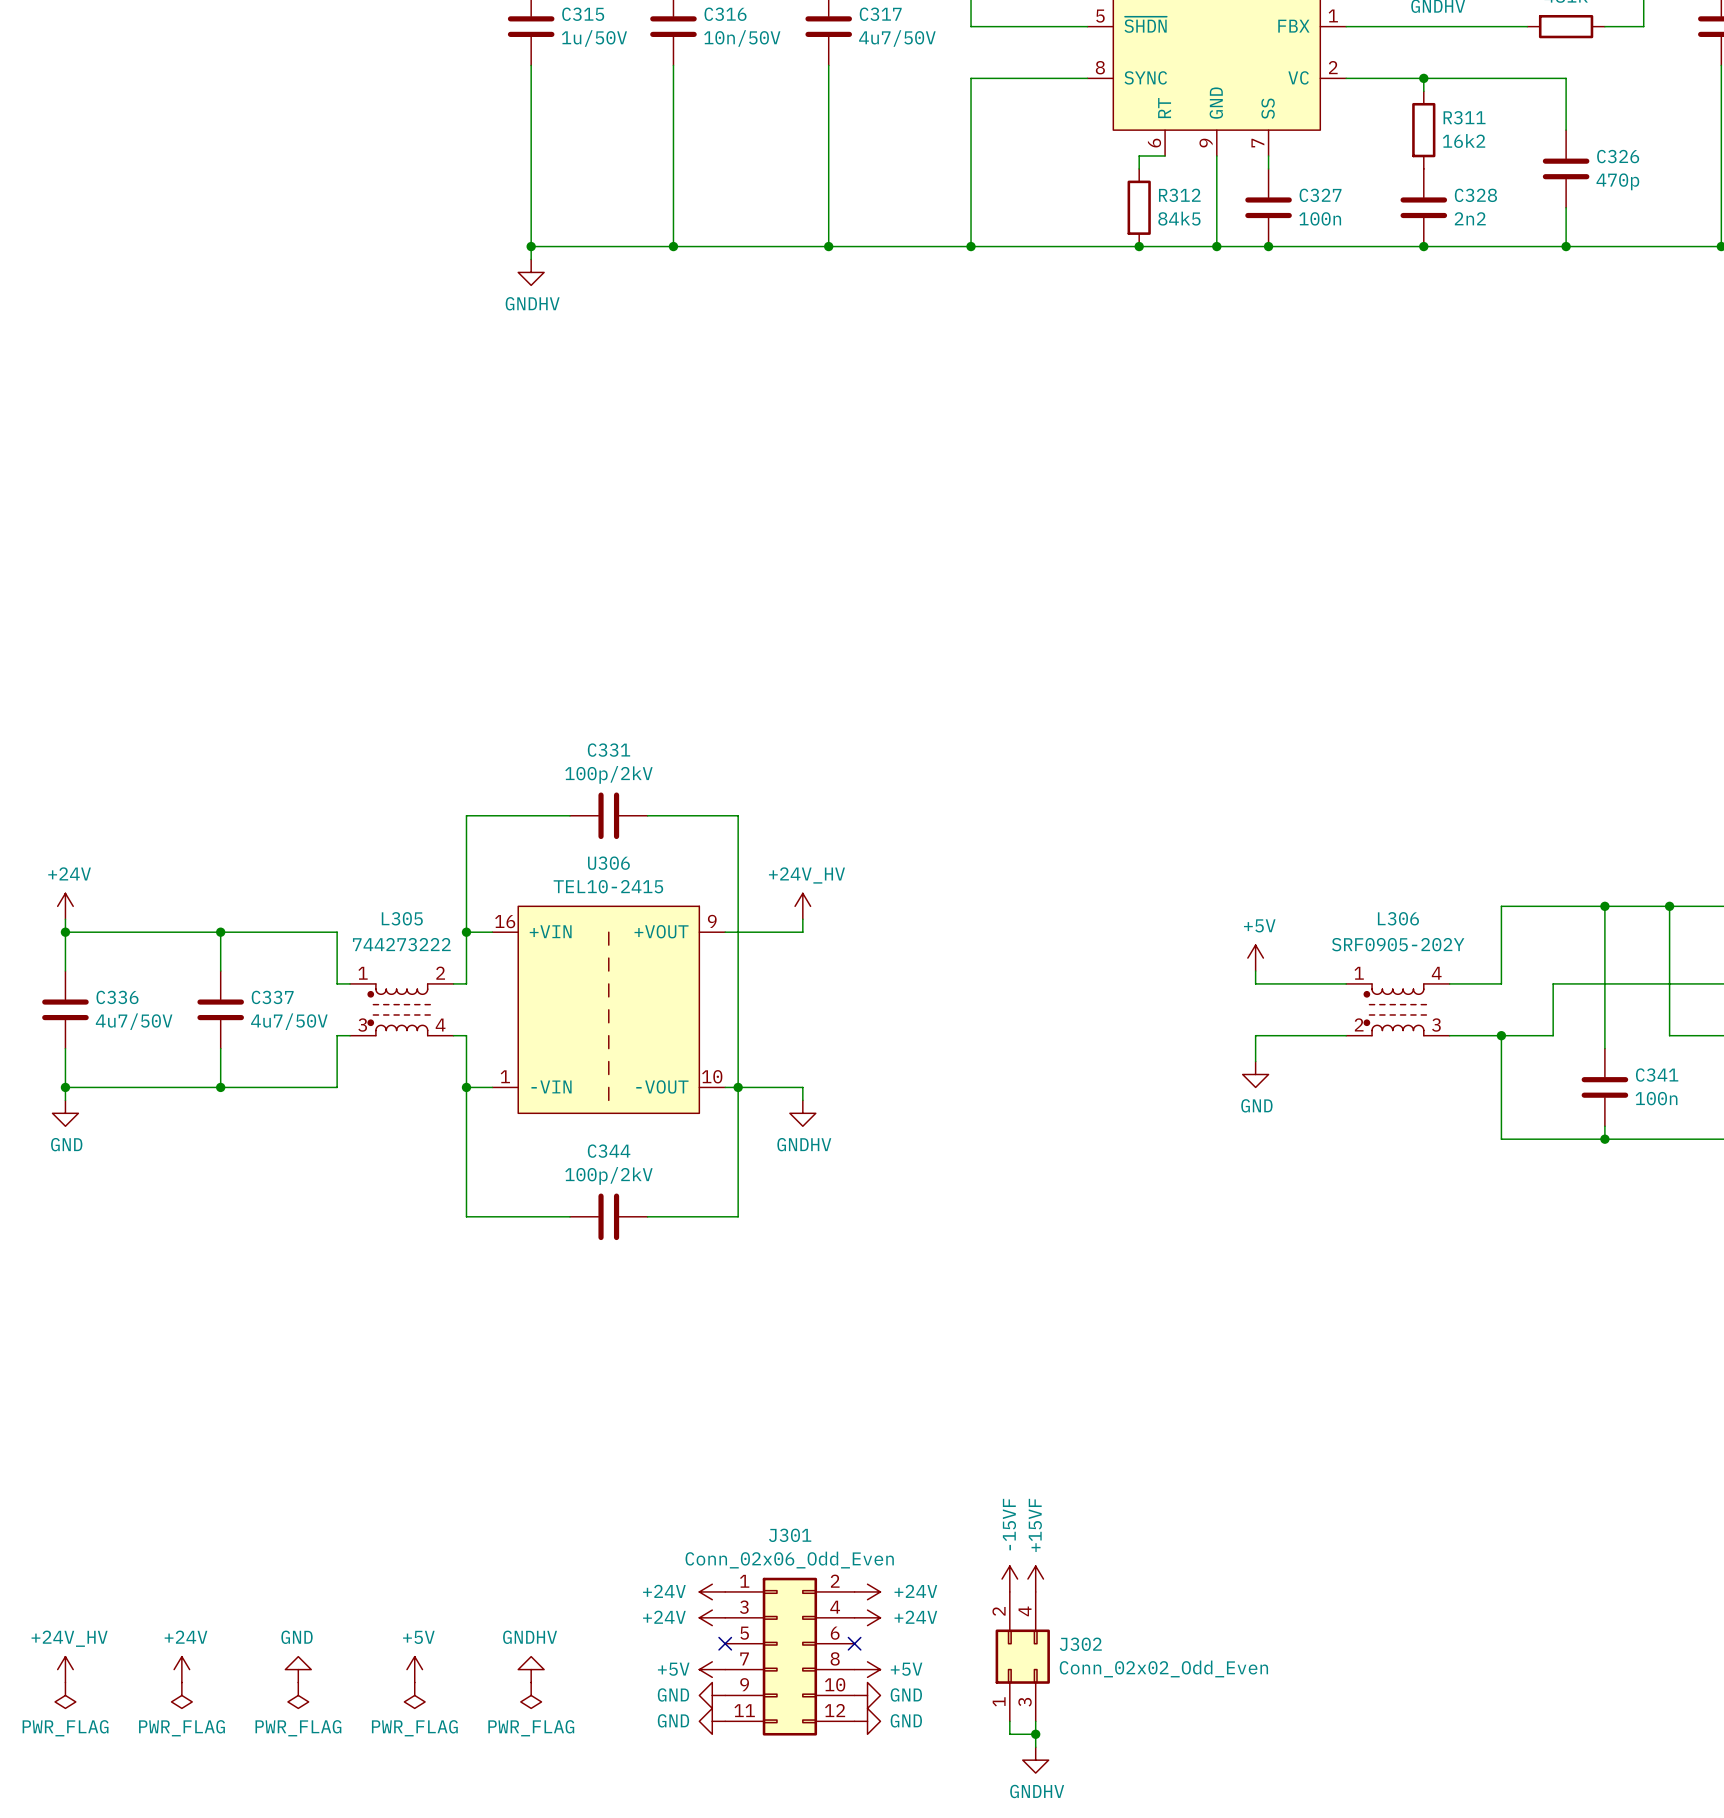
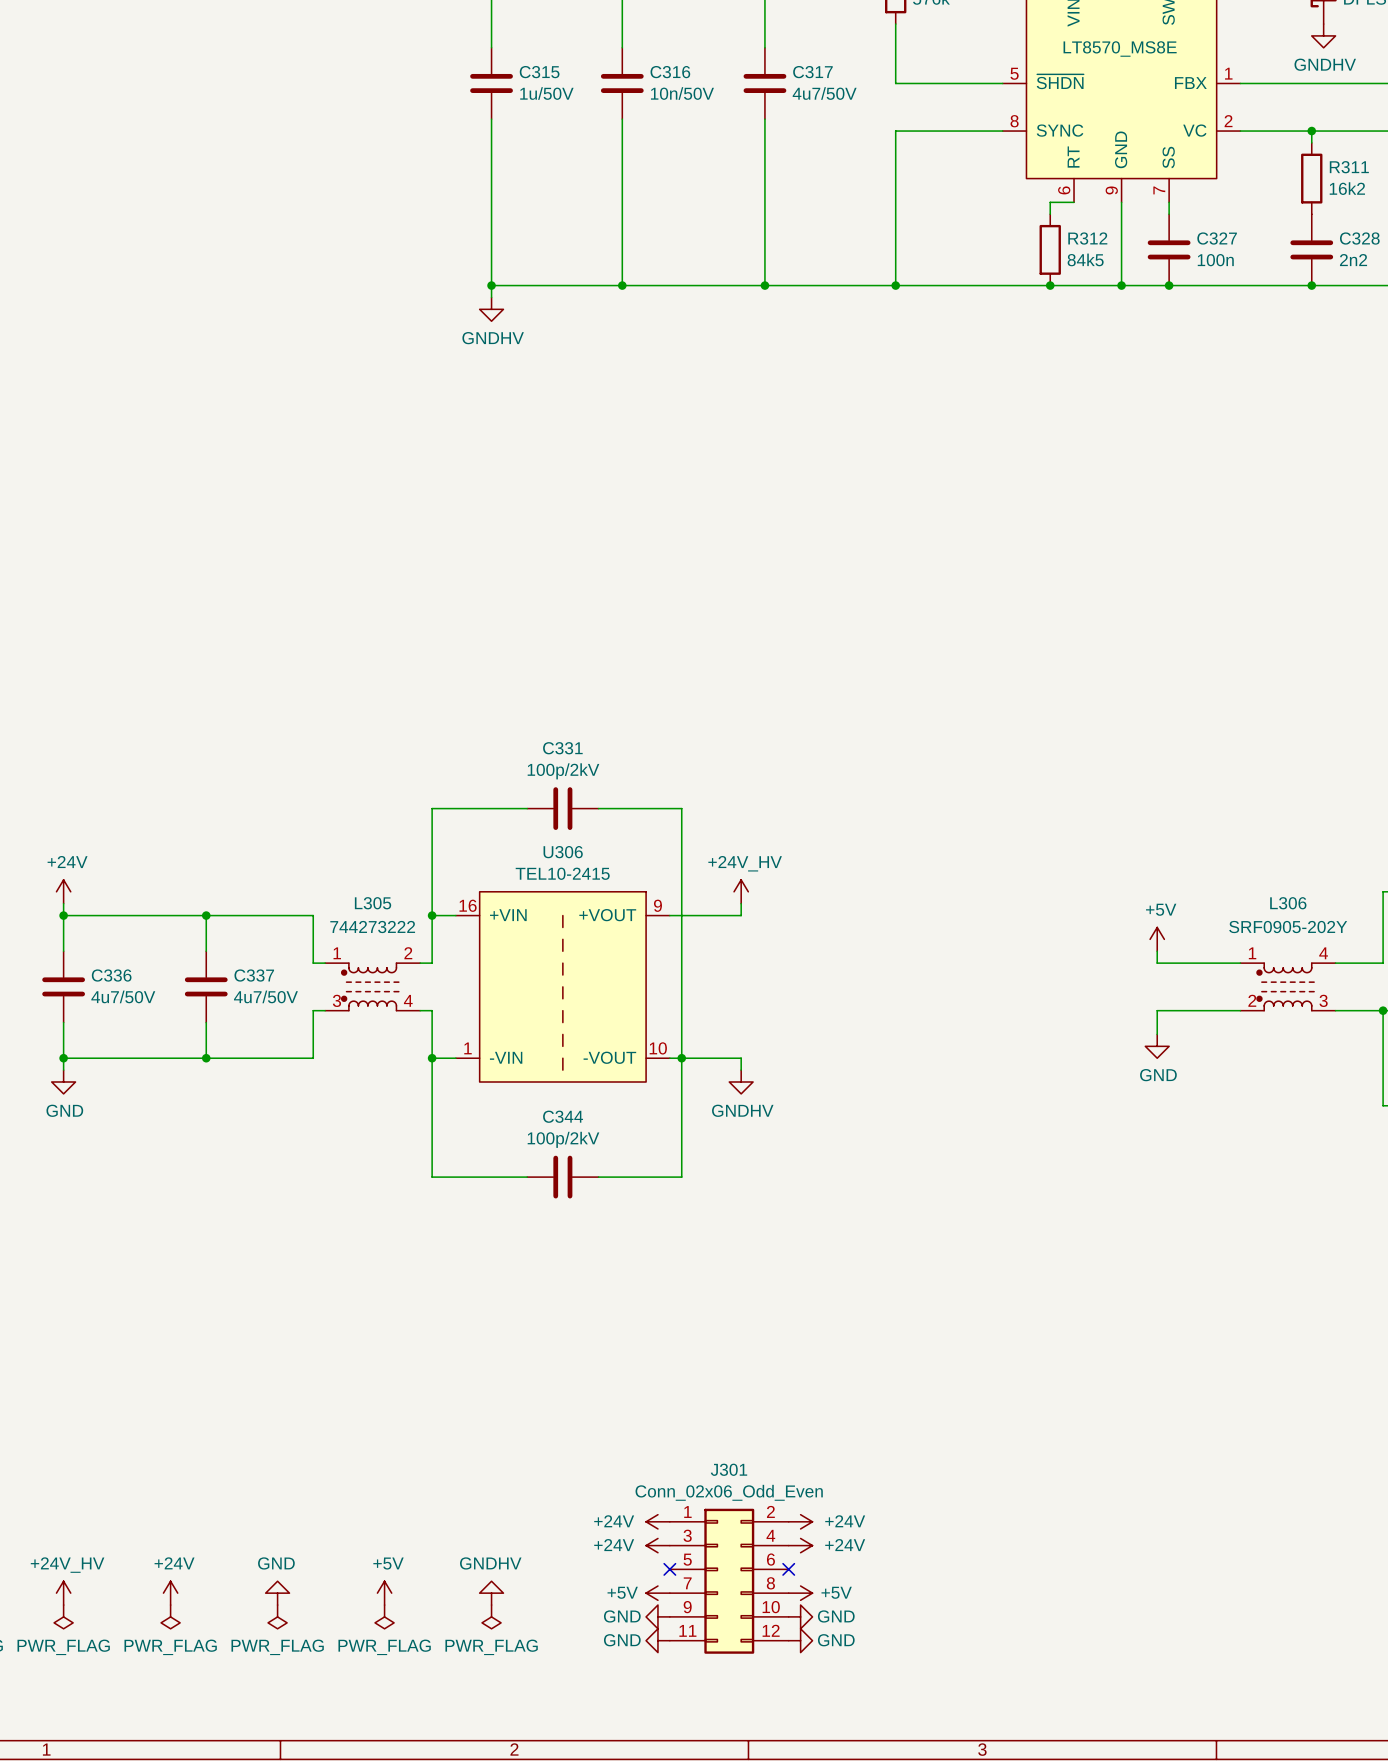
power symbol: -15VF (1009, 1579) -> none
power symbol: +15VF (1035, 1579) -> none
J302: Conn_02x02_Odd_Even (1022, 1656) -> none
wire: (1009, 1721) (1009, 1734) (1035, 1734) -> none
wire: (1035, 1721) (1035, 1747) -> none
junction: (1035, 1734) -> none
power symbol: GNDHV (1035, 1760) -> none

